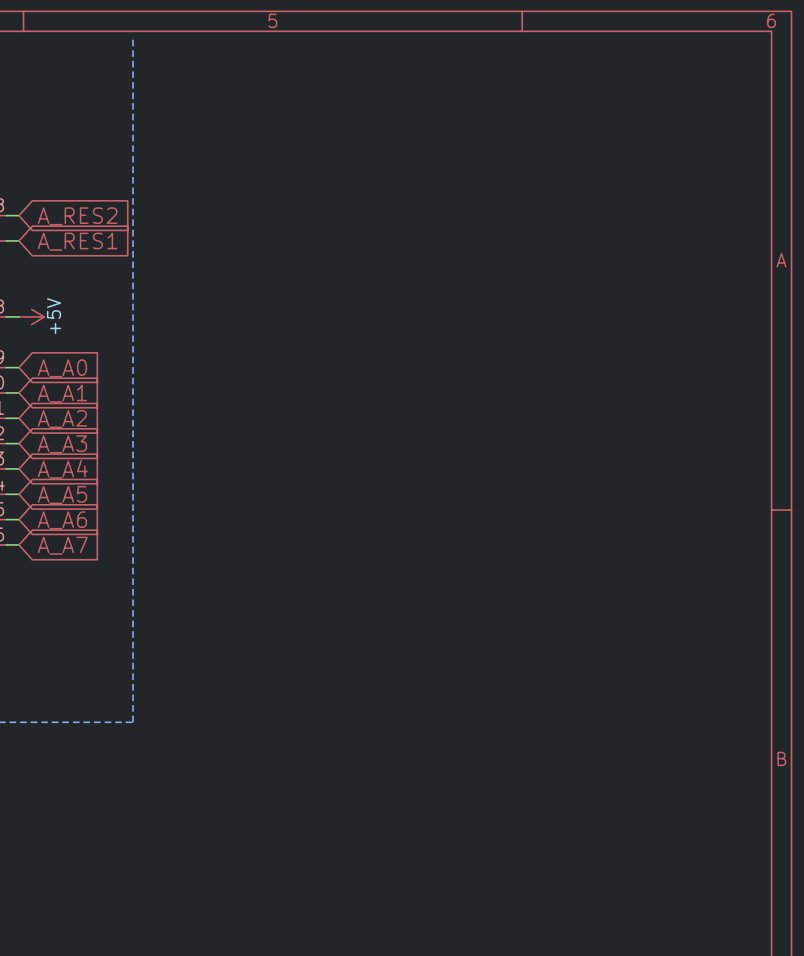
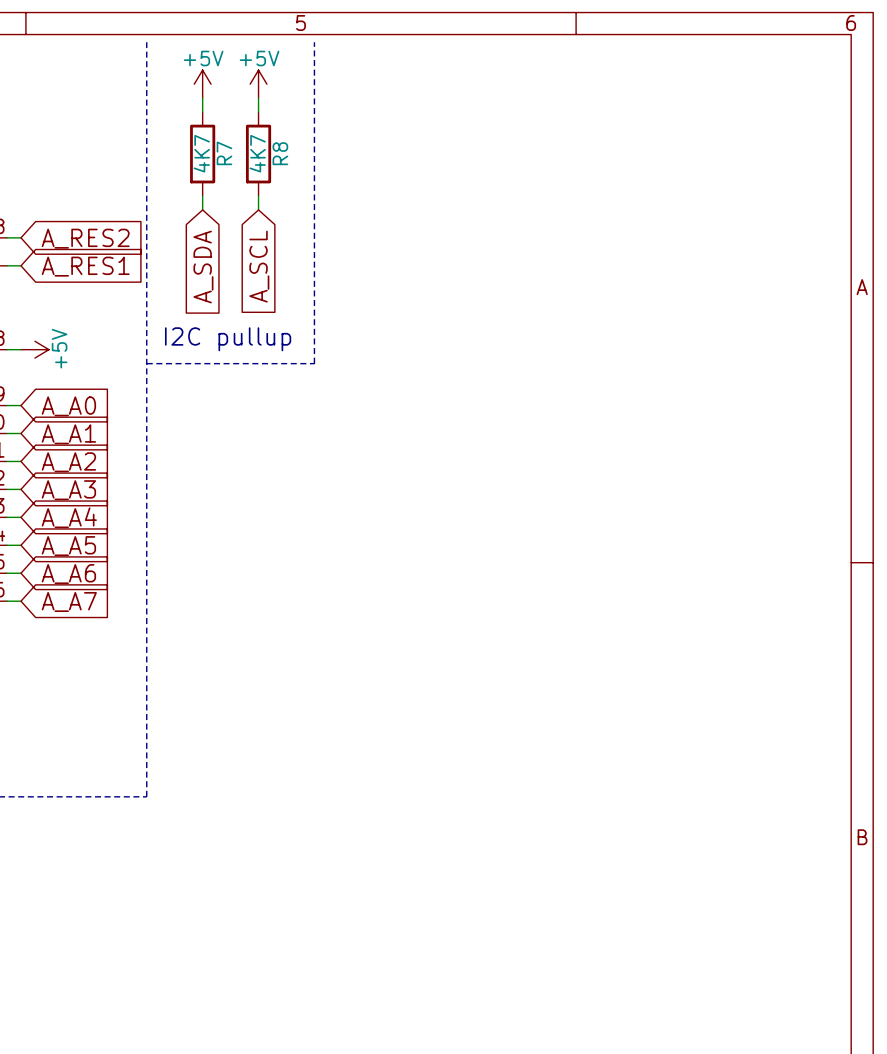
line: none -> (314, 42) (314, 363) (146, 363)
power symbol: none -> +5V (202, 84)
power symbol: none -> +5V (258, 84)
wire: none -> (202, 98) (202, 112)
wire: none -> (258, 98) (258, 112)
R7: none -> 4K7 (202, 154)
R8: none -> 4K7 (258, 154)
wire: none -> (202, 195) (202, 209)
wire: none -> (258, 195) (258, 209)
global label: none -> A_SCL (259, 266)
global label: none -> A_SDA (203, 267)
text: none -> I2C pullup (228, 339)

